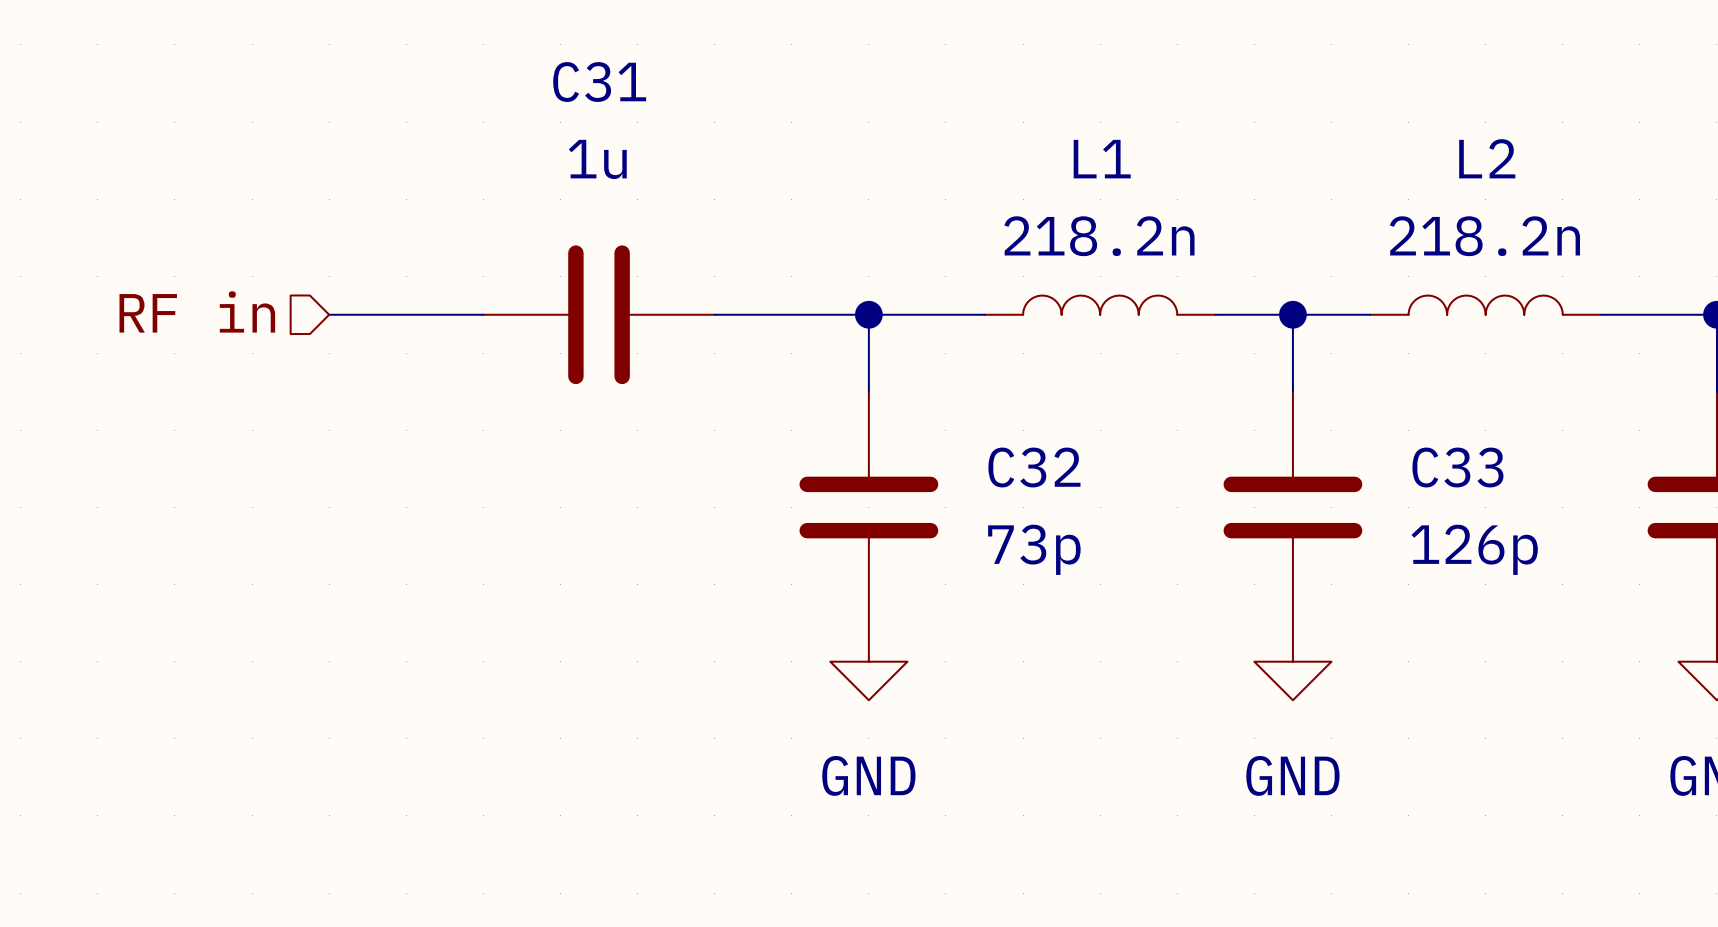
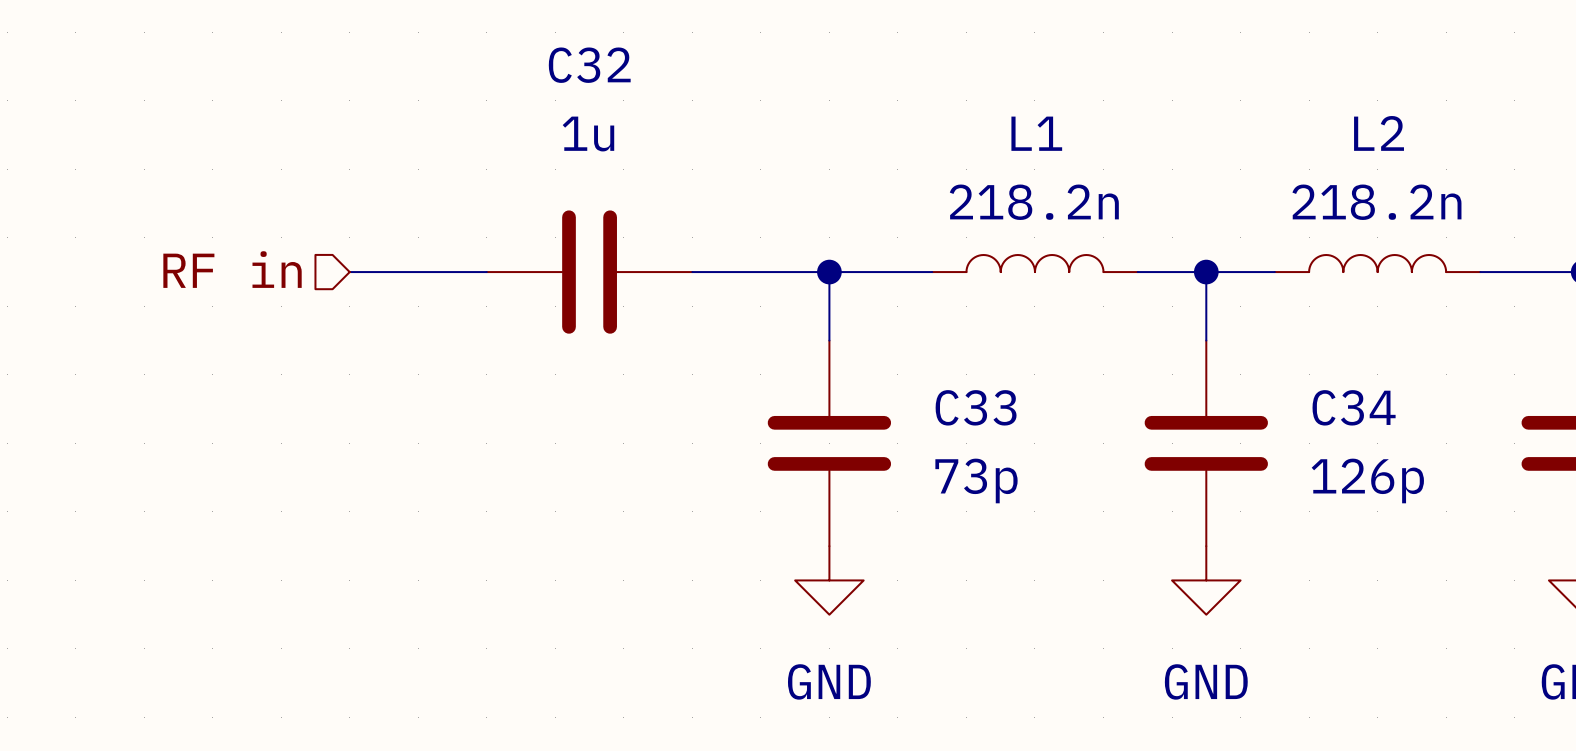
C31 name: C31 (599, 82) -> C32 (589, 65)
C32 name: C32 (1034, 467) -> C33 (976, 407)
C33 name: C33 (1457, 467) -> C34 (1354, 407)

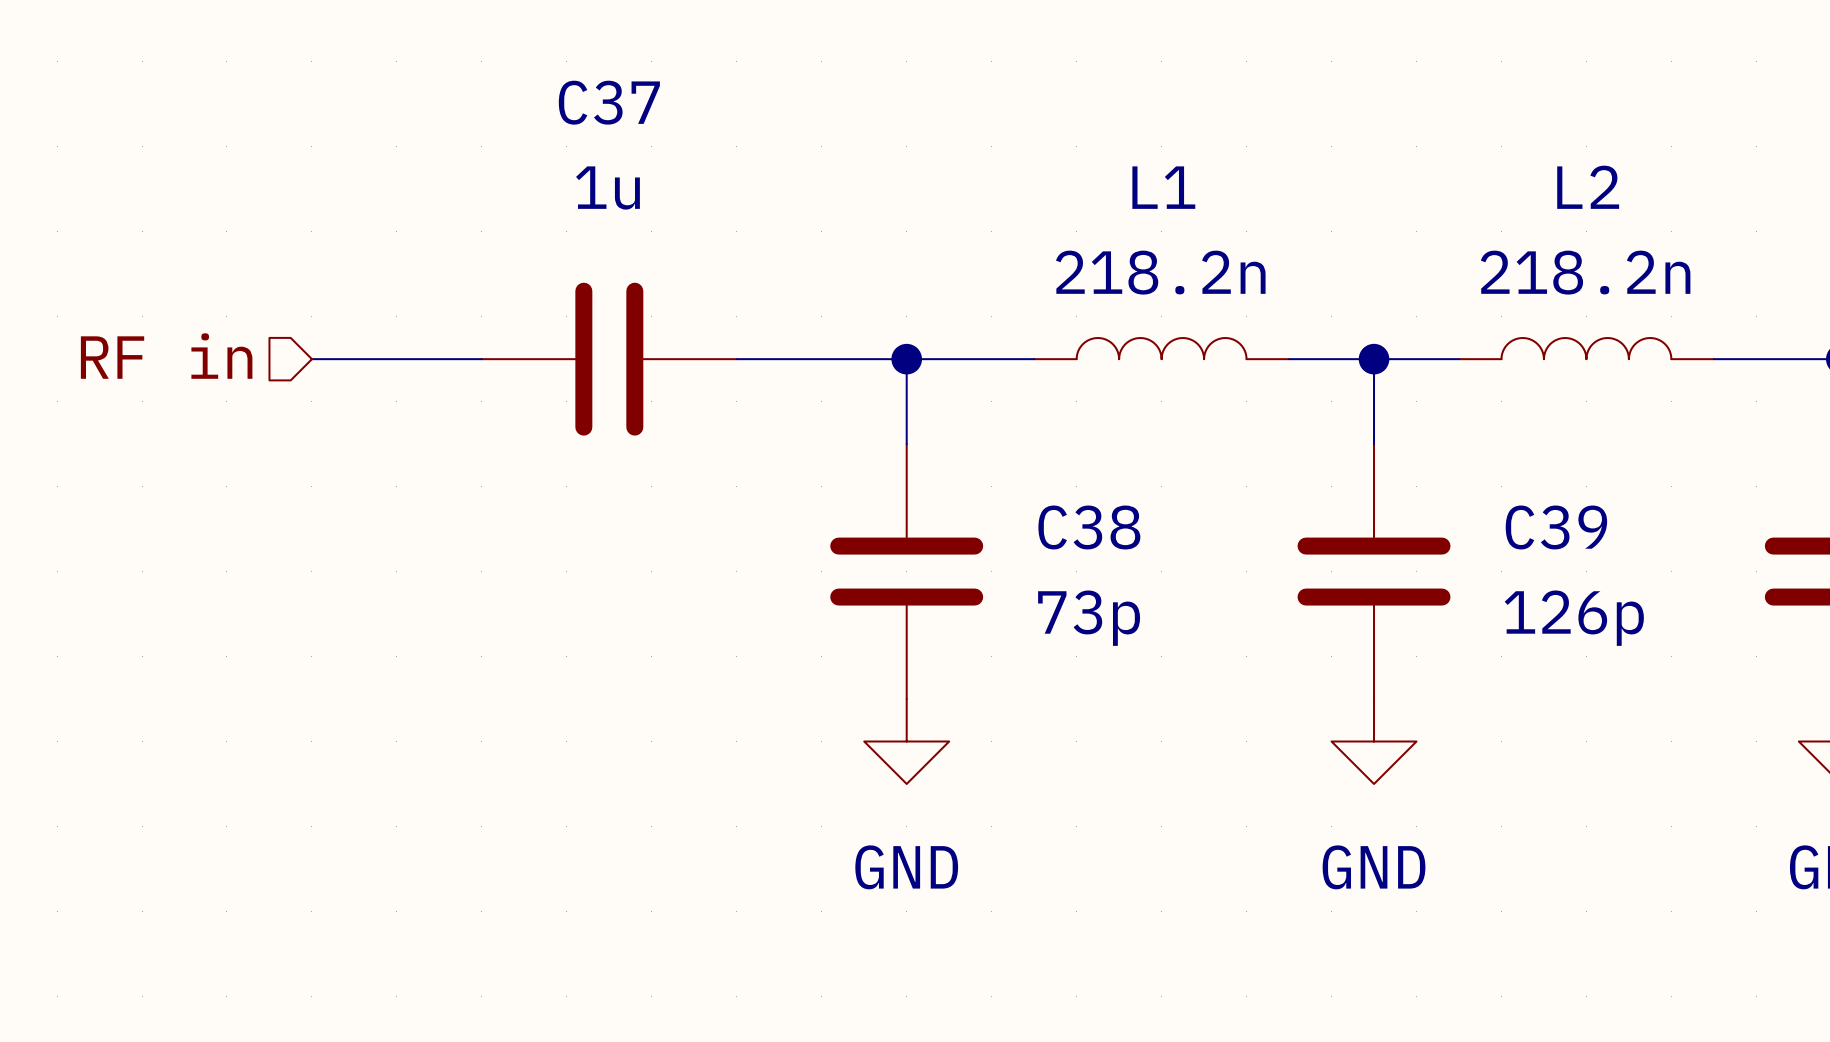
C32 name: C32 (589, 65) -> C37 (609, 102)
C33 name: C33 (976, 407) -> C38 (1089, 527)
C34 name: C34 (1354, 407) -> C39 (1556, 527)

